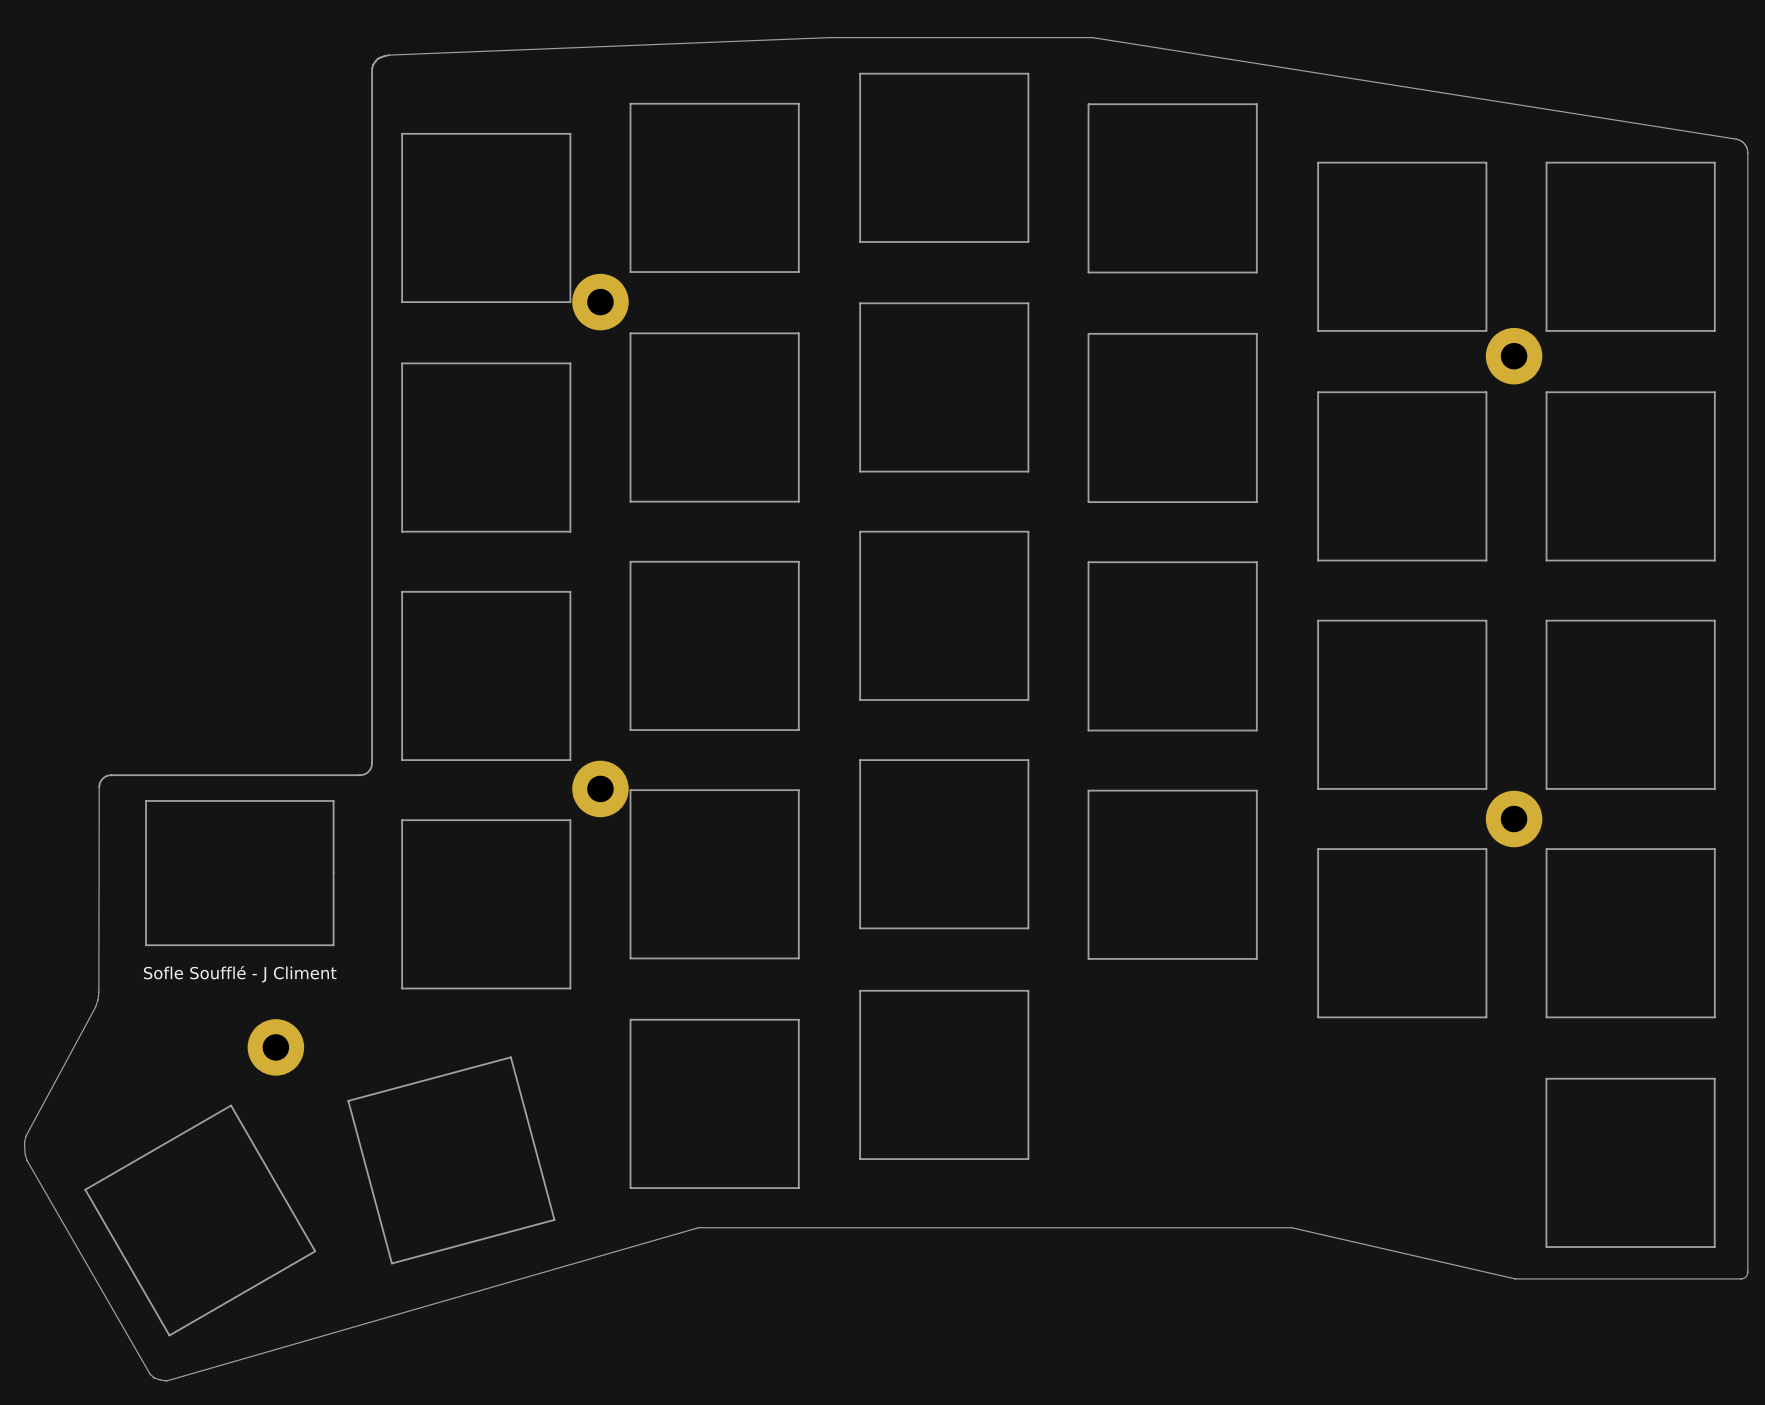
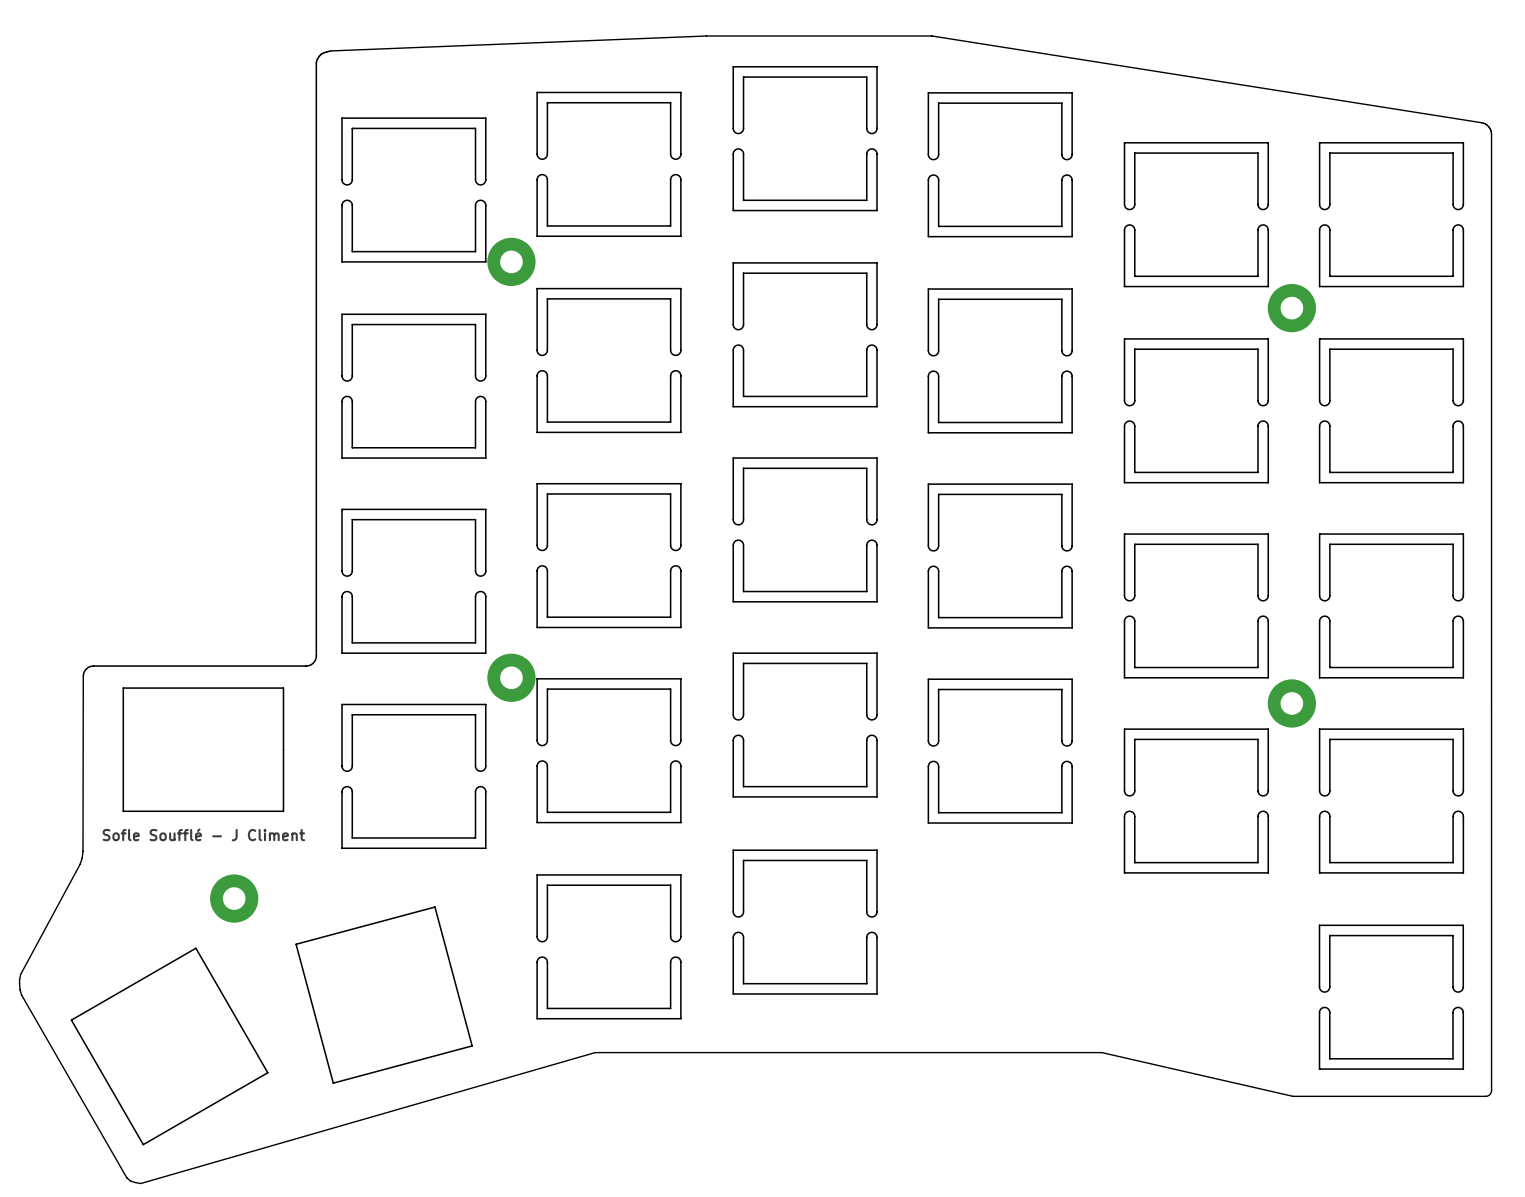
board edge: (860, 145) (860, 175) -> (733, 128) (737, 133) (743, 129) (743, 77) (866, 77) (866, 129) (872, 133) (877, 128)
board edge: (1028, 145) (1028, 175) -> (733, 154) (737, 148) (743, 152) (743, 200) (866, 200) (866, 152) (872, 148) (877, 154)
board edge: (630, 175) (630, 205) -> (537, 154) (541, 159) (547, 155) (547, 102) (670, 102) (670, 155) (676, 159) (680, 154)
board edge: (798, 175) (798, 205) -> (537, 179) (541, 174) (547, 178) (547, 225) (670, 225) (670, 178) (676, 174) (680, 179)
board edge: (1088, 176) (1088, 206) -> (928, 154) (932, 159) (938, 155) (938, 103) (1061, 103) (1062, 155) (1067, 159) (1072, 154)
board edge: (1256, 176) (1256, 206) -> (928, 180) (932, 175) (938, 178) (938, 226) (1061, 226) (1062, 178) (1067, 175) (1072, 180)
board edge: (402, 205) (402, 235) -> (342, 179) (346, 184) (352, 180) (352, 128) (475, 128) (475, 181) (481, 184) (485, 179)
board edge: (570, 205) (570, 235) -> (342, 205) (346, 200) (352, 204) (352, 251) (475, 251) (475, 204) (481, 200) (485, 205)
board edge: (1318, 234) (1318, 264) -> (1124, 204) (1129, 209) (1134, 205) (1134, 153) (1257, 153) (1258, 205) (1263, 209) (1268, 204)
board edge: (1486, 234) (1486, 264) -> (1124, 230) (1129, 224) (1134, 228) (1134, 276) (1257, 276) (1258, 228) (1263, 224) (1268, 230)
board edge: (1546, 234) (1546, 264) -> (1319, 204) (1324, 209) (1329, 205) (1329, 153) (1453, 153) (1453, 205) (1458, 209) (1463, 204)
board edge: (1714, 234) (1714, 264) -> (1319, 230) (1324, 224) (1329, 228) (1329, 276) (1453, 276) (1453, 228) (1458, 224) (1463, 230)
board edge: (860, 375) (860, 405) -> (733, 324) (737, 329) (743, 325) (743, 273) (866, 273) (866, 325) (872, 329) (877, 324)
board edge: (1028, 375) (1028, 405) -> (733, 350) (737, 345) (743, 348) (743, 396) (866, 396) (866, 348) (872, 345) (877, 350)
board edge: (630, 405) (630, 435) -> (537, 350) (541, 355) (547, 351) (547, 298) (670, 298) (670, 351) (676, 355) (680, 350)
board edge: (798, 405) (798, 435) -> (537, 375) (541, 370) (547, 374) (547, 422) (670, 422) (670, 374) (676, 370) (680, 375)
board edge: (1088, 405) (1088, 436) -> (928, 350) (932, 355) (938, 351) (938, 299) (1061, 299) (1062, 351) (1067, 355) (1072, 350)
board edge: (1256, 405) (1256, 436) -> (928, 376) (932, 371) (938, 375) (938, 422) (1061, 422) (1062, 375) (1067, 371) (1072, 376)
board edge: (402, 435) (402, 465) -> (342, 375) (346, 380) (352, 377) (352, 324) (475, 324) (475, 377) (481, 380) (485, 375)
board edge: (570, 435) (570, 465) -> (342, 401) (346, 396) (352, 400) (352, 447) (475, 447) (475, 400) (481, 396) (485, 401)
board edge: (1318, 464) (1318, 494) -> (1124, 400) (1128, 405) (1134, 401) (1134, 349) (1257, 349) (1258, 401) (1263, 405) (1268, 400)
board edge: (1486, 464) (1486, 494) -> (1124, 426) (1129, 421) (1134, 424) (1134, 472) (1257, 472) (1258, 424) (1263, 421) (1268, 426)
board edge: (1546, 464) (1546, 494) -> (1319, 400) (1324, 405) (1329, 401) (1329, 349) (1453, 349) (1453, 401) (1458, 405) (1463, 400)
board edge: (1714, 464) (1714, 494) -> (1319, 426) (1324, 421) (1329, 424) (1329, 472) (1453, 472) (1453, 424) (1458, 421) (1463, 426)
board edge: (860, 603) (860, 633) -> (733, 519) (737, 524) (743, 520) (743, 468) (866, 468) (866, 520) (872, 524) (877, 519)
board edge: (1028, 603) (1028, 633) -> (733, 545) (737, 540) (743, 544) (743, 591) (866, 591) (866, 544) (872, 540) (877, 545)
board edge: (630, 633) (630, 663) -> (537, 545) (541, 550) (547, 546) (547, 493) (670, 493) (670, 546) (676, 550) (680, 545)
board edge: (798, 633) (798, 663) -> (537, 571) (541, 565) (547, 569) (547, 617) (670, 617) (670, 569) (676, 565) (680, 571)
board edge: (1088, 634) (1088, 664) -> (928, 545) (932, 550) (938, 547) (938, 494) (1061, 494) (1062, 547) (1067, 550) (1072, 545)
board edge: (1256, 634) (1256, 664) -> (928, 571) (932, 566) (938, 570) (938, 617) (1061, 617) (1062, 570) (1067, 566) (1072, 571)
board edge: (402, 663) (402, 693) -> (342, 571) (346, 576) (352, 572) (352, 519) (475, 519) (475, 572) (481, 576) (485, 571)
board edge: (570, 663) (570, 693) -> (342, 596) (346, 591) (352, 595) (352, 642) (475, 642) (475, 595) (481, 591) (485, 596)
board edge: (1318, 692) (1318, 722) -> (1124, 595) (1129, 600) (1134, 596) (1134, 544) (1257, 544) (1258, 596) (1263, 600) (1268, 595)
board edge: (1486, 692) (1486, 722) -> (1124, 621) (1129, 616) (1134, 620) (1134, 667) (1257, 667) (1258, 620) (1263, 616) (1268, 621)
board edge: (1546, 692) (1546, 722) -> (1319, 595) (1324, 600) (1329, 596) (1329, 544) (1453, 544) (1453, 596) (1458, 600) (1463, 595)
board edge: (1714, 692) (1714, 722) -> (1319, 621) (1324, 616) (1329, 620) (1329, 667) (1453, 667) (1453, 620) (1458, 616) (1463, 621)
board edge: (860, 832) (860, 862) -> (733, 714) (737, 719) (743, 716) (743, 663) (866, 663) (866, 716) (872, 719) (877, 714)
board edge: (1028, 832) (1028, 862) -> (733, 740) (737, 735) (743, 739) (743, 786) (866, 786) (866, 739) (872, 735) (877, 740)
board edge: (630, 862) (630, 892) -> (537, 740) (541, 745) (547, 741) (547, 689) (670, 689) (670, 741) (676, 745) (680, 740)
board edge: (798, 862) (798, 892) -> (537, 766) (541, 761) (547, 764) (547, 812) (670, 812) (670, 764) (676, 761) (680, 766)
board edge: (1088, 862) (1088, 892) -> (928, 740) (932, 745) (938, 742) (938, 689) (1061, 689) (1062, 742) (1067, 745) (1072, 740)
board edge: (1256, 862) (1256, 892) -> (928, 766) (932, 761) (938, 765) (938, 812) (1061, 812) (1062, 765) (1067, 761) (1072, 766)
board edge: (402, 892) (402, 922) -> (342, 766) (346, 771) (352, 767) (352, 714) (475, 714) (475, 767) (481, 771) (485, 766)
board edge: (570, 892) (570, 922) -> (342, 791) (346, 786) (352, 790) (352, 837) (475, 837) (475, 790) (481, 786) (485, 791)
board edge: (1318, 921) (1318, 951) -> (1124, 790) (1128, 795) (1134, 792) (1134, 739) (1257, 739) (1258, 792) (1263, 795) (1268, 790)
board edge: (1486, 921) (1486, 951) -> (1124, 816) (1129, 811) (1134, 815) (1134, 862) (1257, 862) (1258, 815) (1263, 811) (1268, 816)
board edge: (1546, 921) (1546, 951) -> (1319, 790) (1324, 795) (1329, 792) (1329, 739) (1453, 739) (1453, 792) (1458, 795) (1463, 790)
board edge: (1714, 921) (1714, 951) -> (1319, 816) (1324, 811) (1329, 815) (1329, 862) (1453, 862) (1453, 815) (1458, 811) (1463, 816)
board edge: (860, 1062) (860, 1092) -> (733, 911) (737, 916) (743, 913) (743, 860) (866, 860) (866, 913) (872, 916) (877, 911)
board edge: (1028, 1062) (1028, 1092) -> (733, 937) (737, 932) (743, 936) (743, 983) (866, 983) (866, 936) (872, 932) (877, 937)
board edge: (630, 1091) (630, 1121) -> (537, 936) (541, 941) (547, 937) (547, 885) (670, 885) (670, 937) (676, 941) (680, 936)
board edge: (798, 1091) (798, 1121) -> (537, 962) (541, 957) (547, 960) (547, 1008) (670, 1008) (670, 961) (676, 957) (680, 962)
board edge: (1546, 1150) (1546, 1180) -> (1319, 986) (1323, 992) (1329, 988) (1329, 935) (1453, 935) (1453, 988) (1458, 992) (1463, 986)
board edge: (1714, 1150) (1714, 1180) -> (1319, 1012) (1323, 1007) (1329, 1011) (1329, 1058) (1453, 1058) (1453, 1011) (1458, 1007) (1463, 1012)

